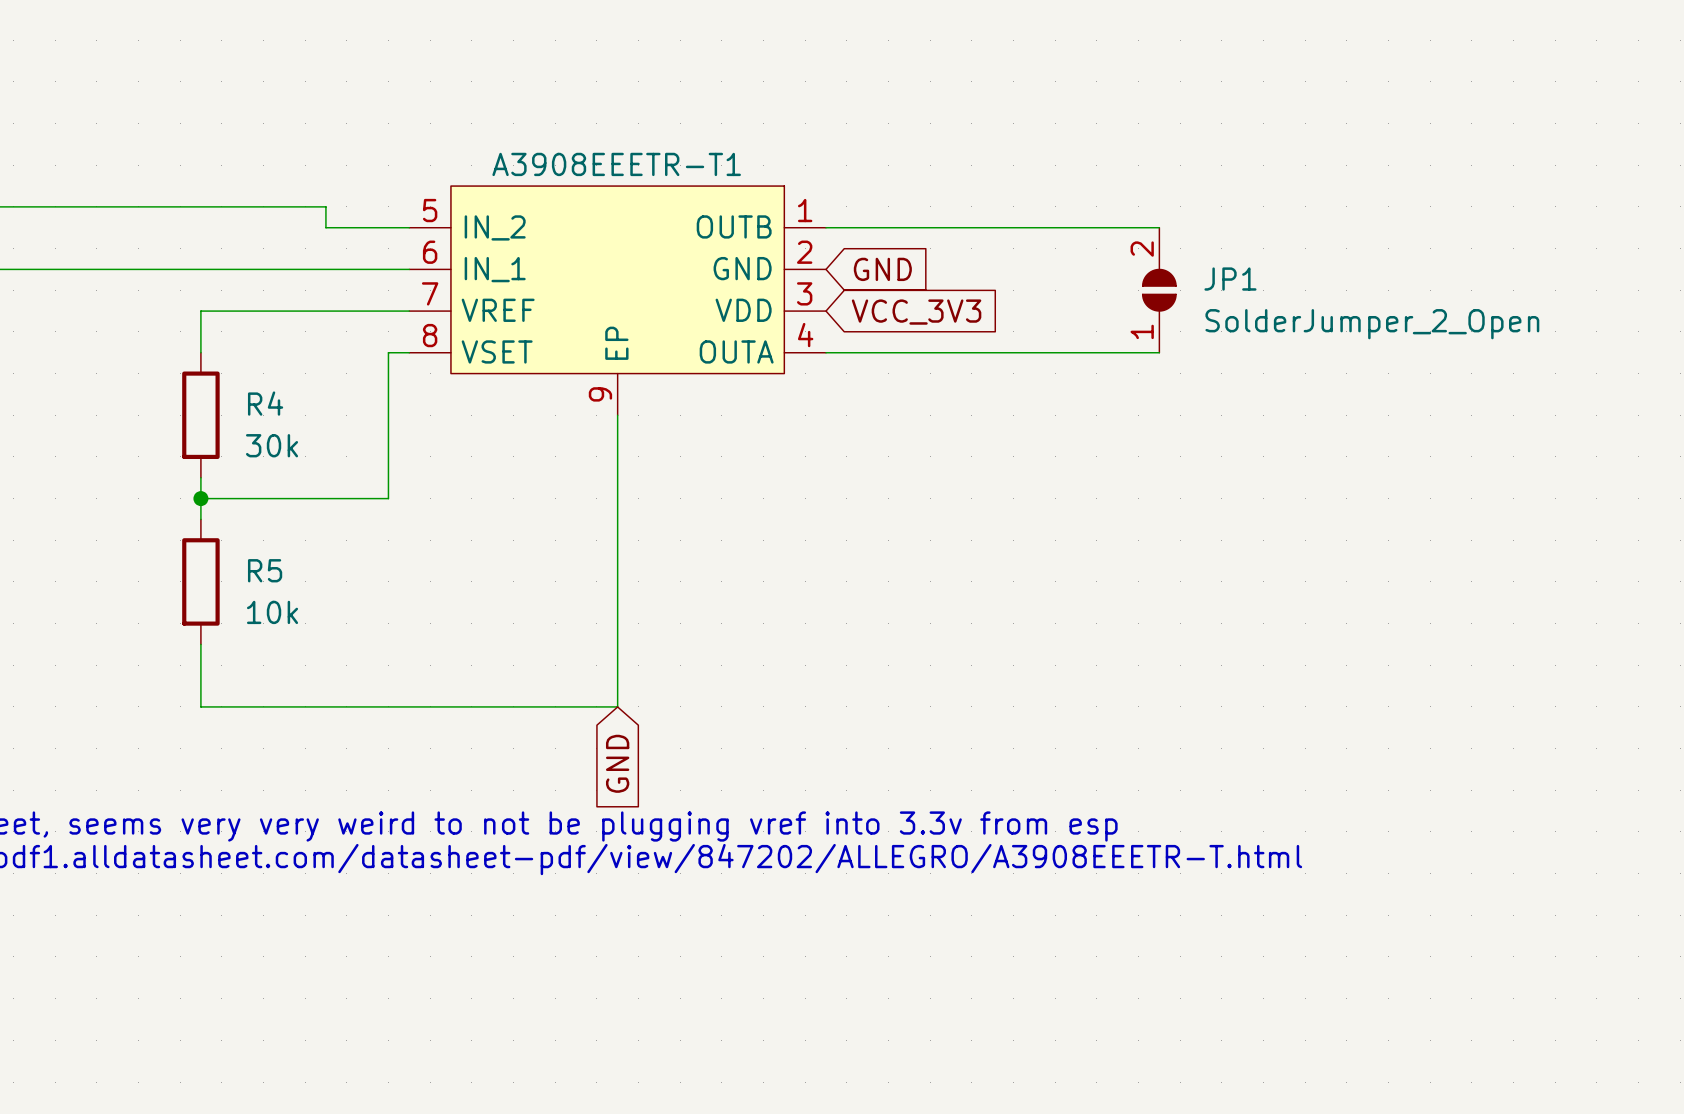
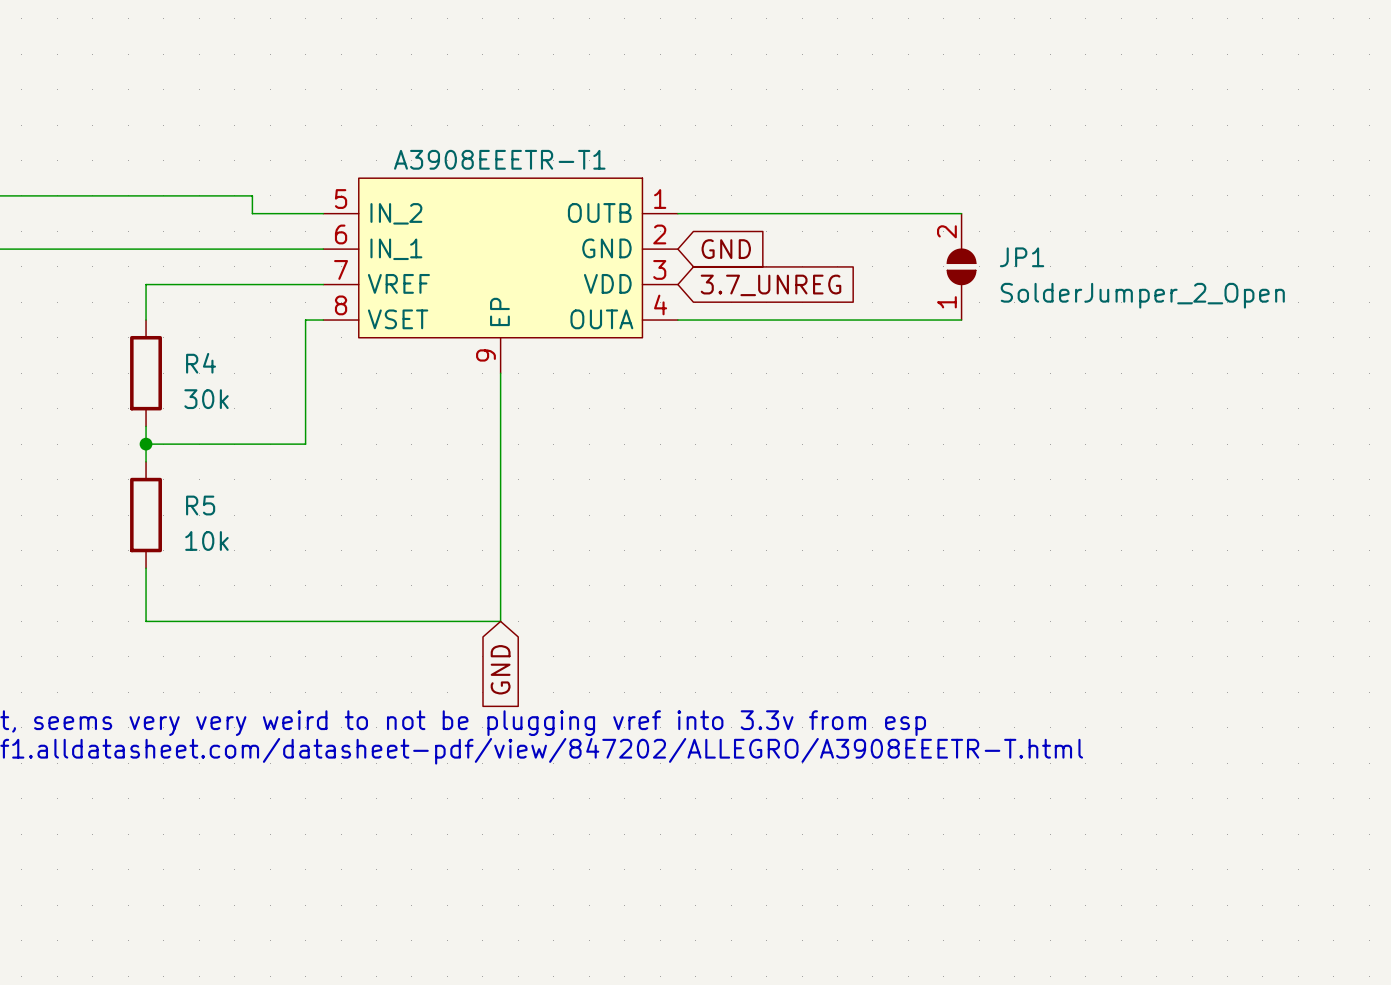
global label: VCC_3V3 (916, 312) -> 3.7_UNREG (771, 285)

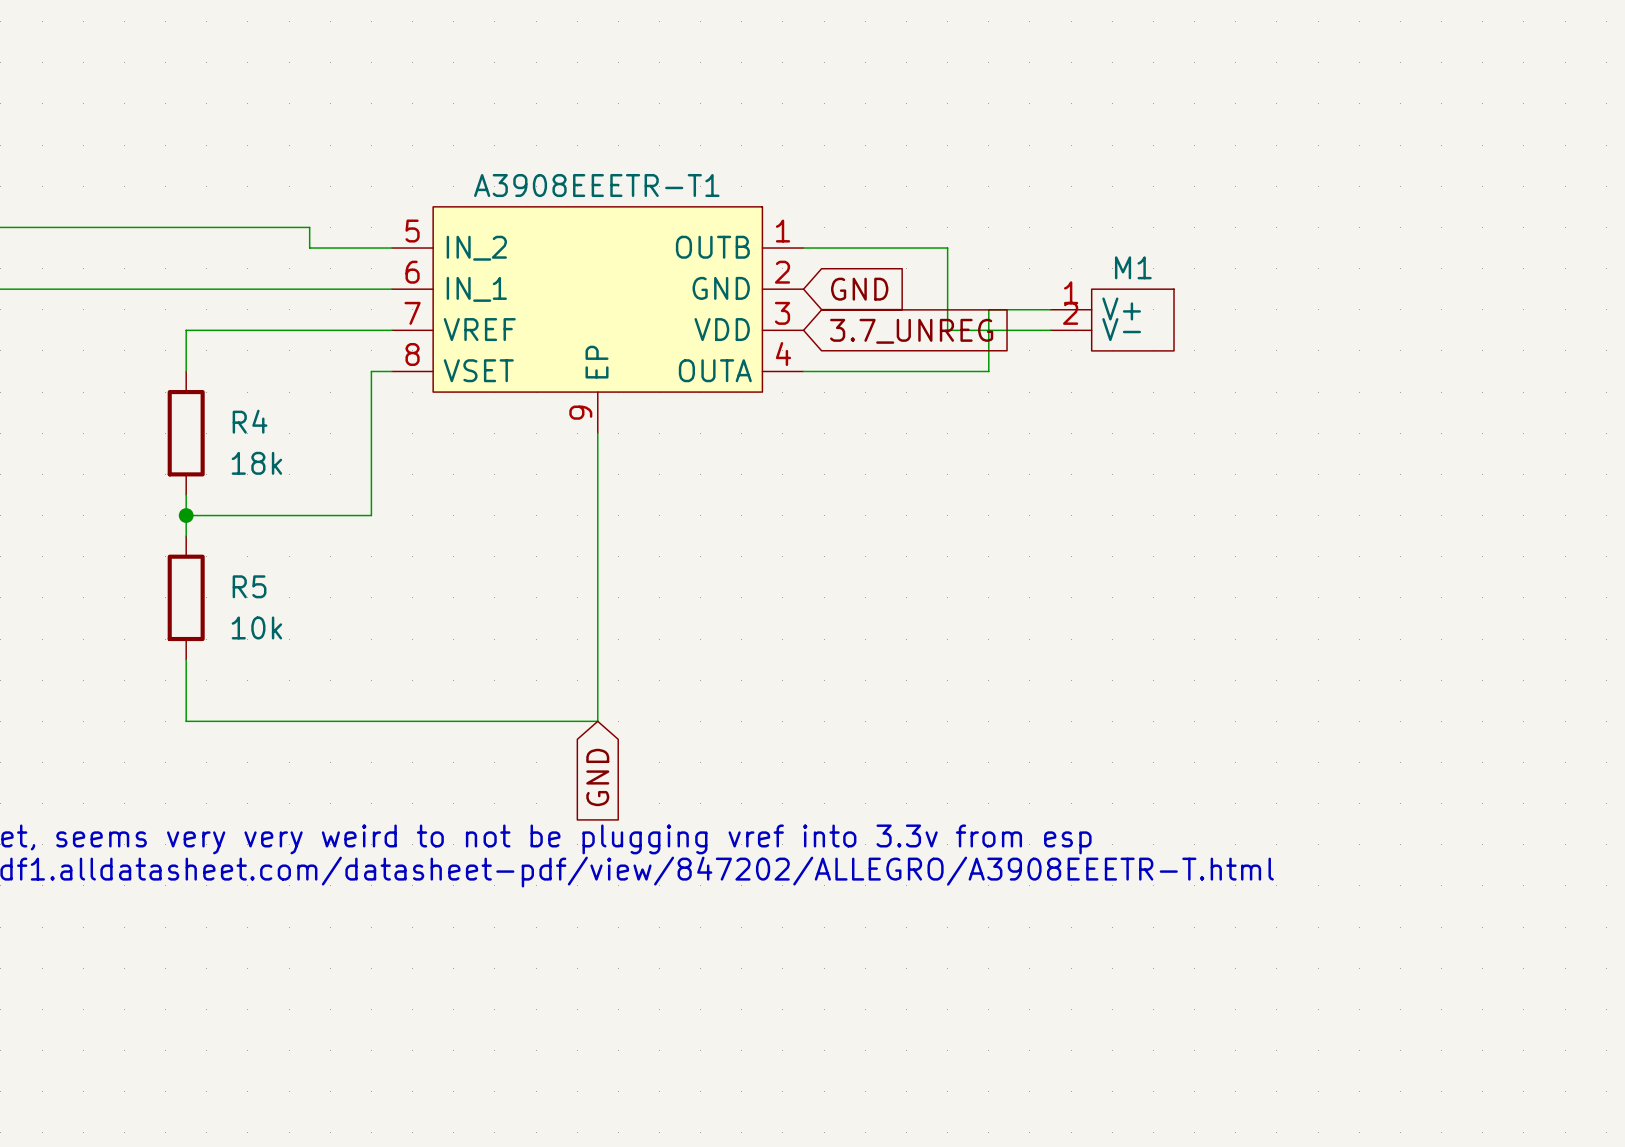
wire: (802, 213) (961, 213) -> (947, 248) (947, 330) (1050, 330)
JP1: SolderJumper_2_Open (961, 266) -> none
M1: none -> (1112, 320)
wire: (837, 320) (961, 320) -> (988, 371) (988, 309) (1050, 309)
R4 value: 30k (206, 399) -> 18k (256, 463)

